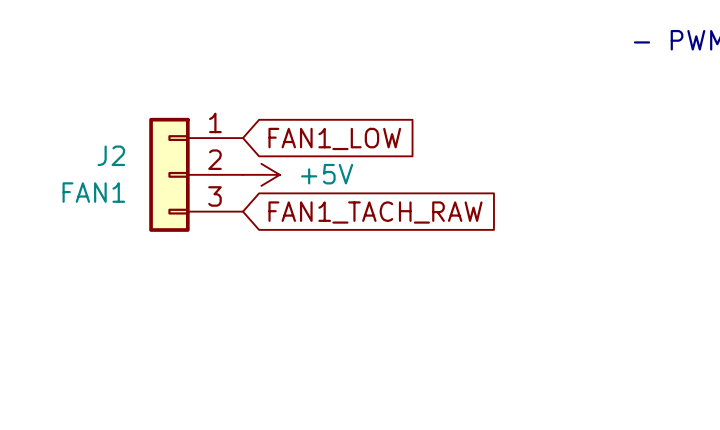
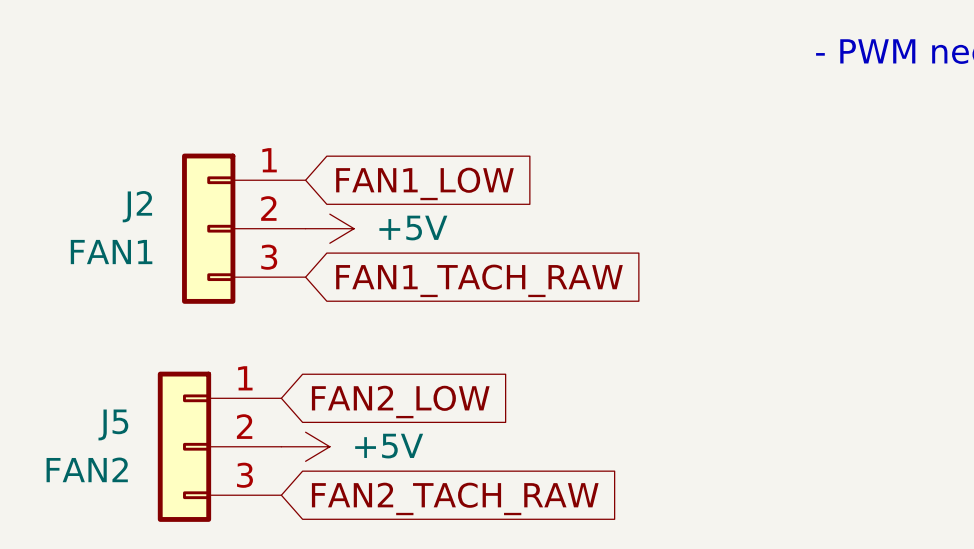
global label: none -> FAN2_LOW (400, 402)
J5: none -> FAN2 (219, 446)
power symbol: none -> +5V (305, 446)
global label: none -> FAN2_TACH_RAW (455, 498)

